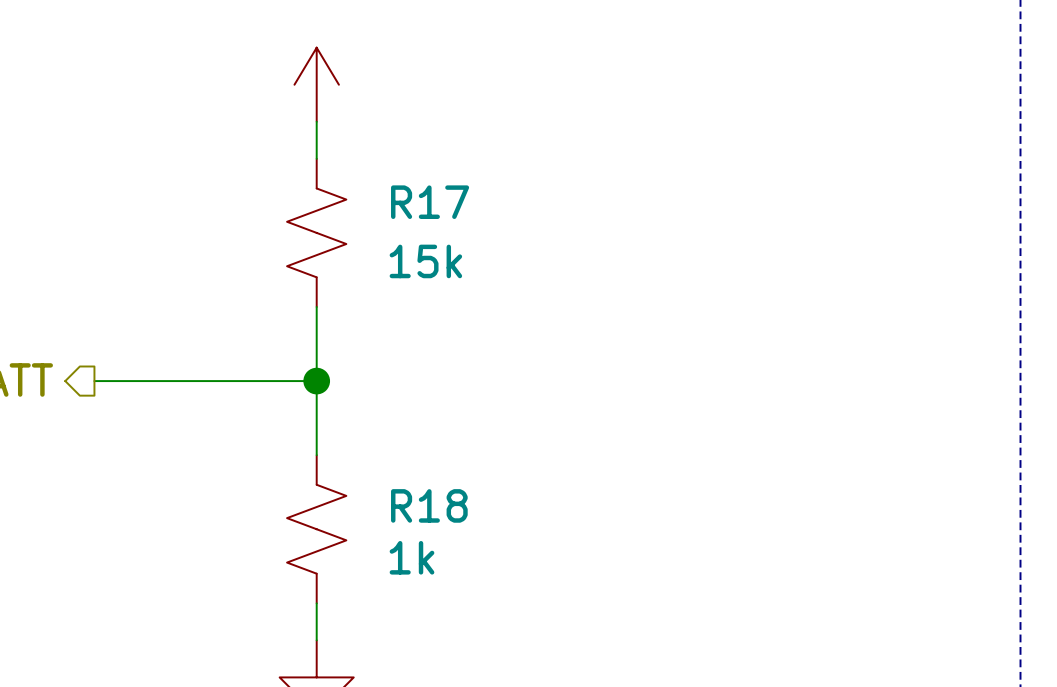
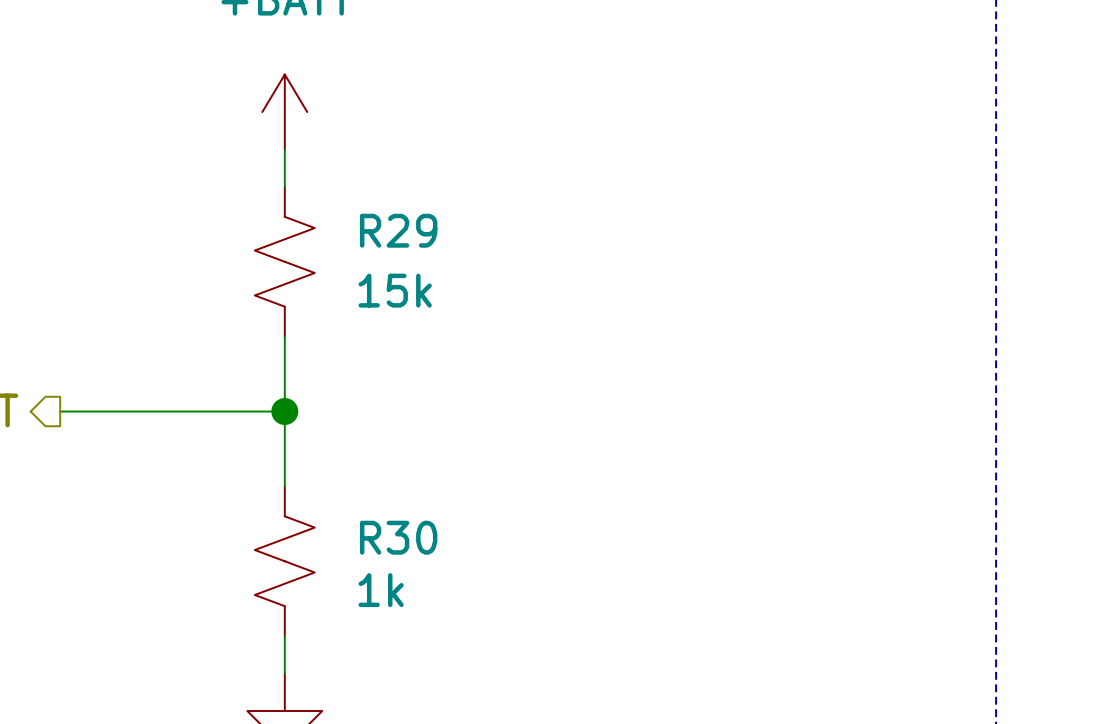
R17 name: R17 (430, 202) -> R29 (398, 230)
R18 name: R18 (429, 505) -> R30 (398, 537)

